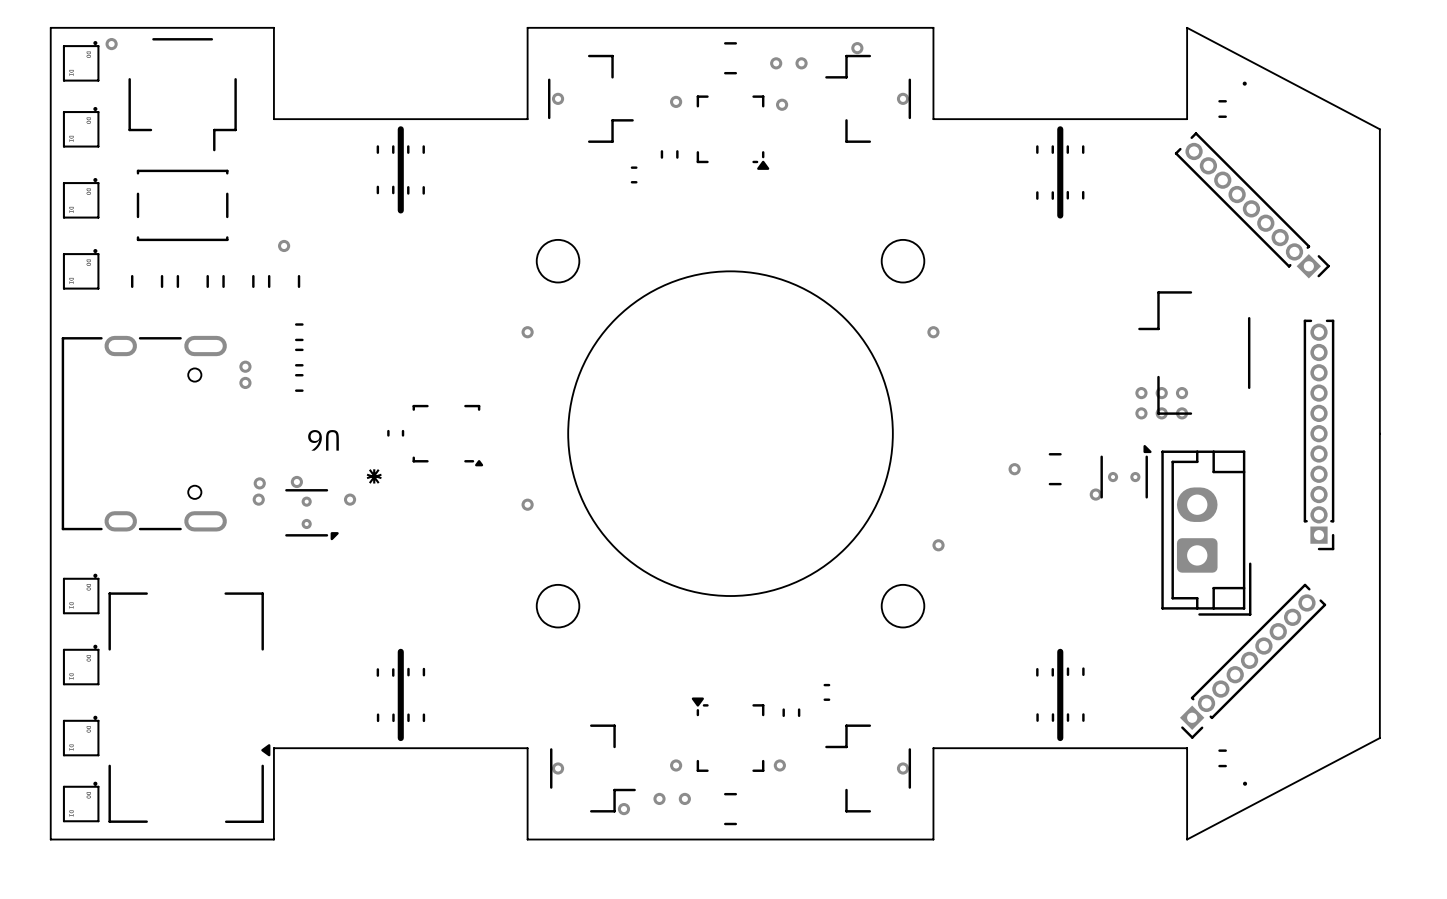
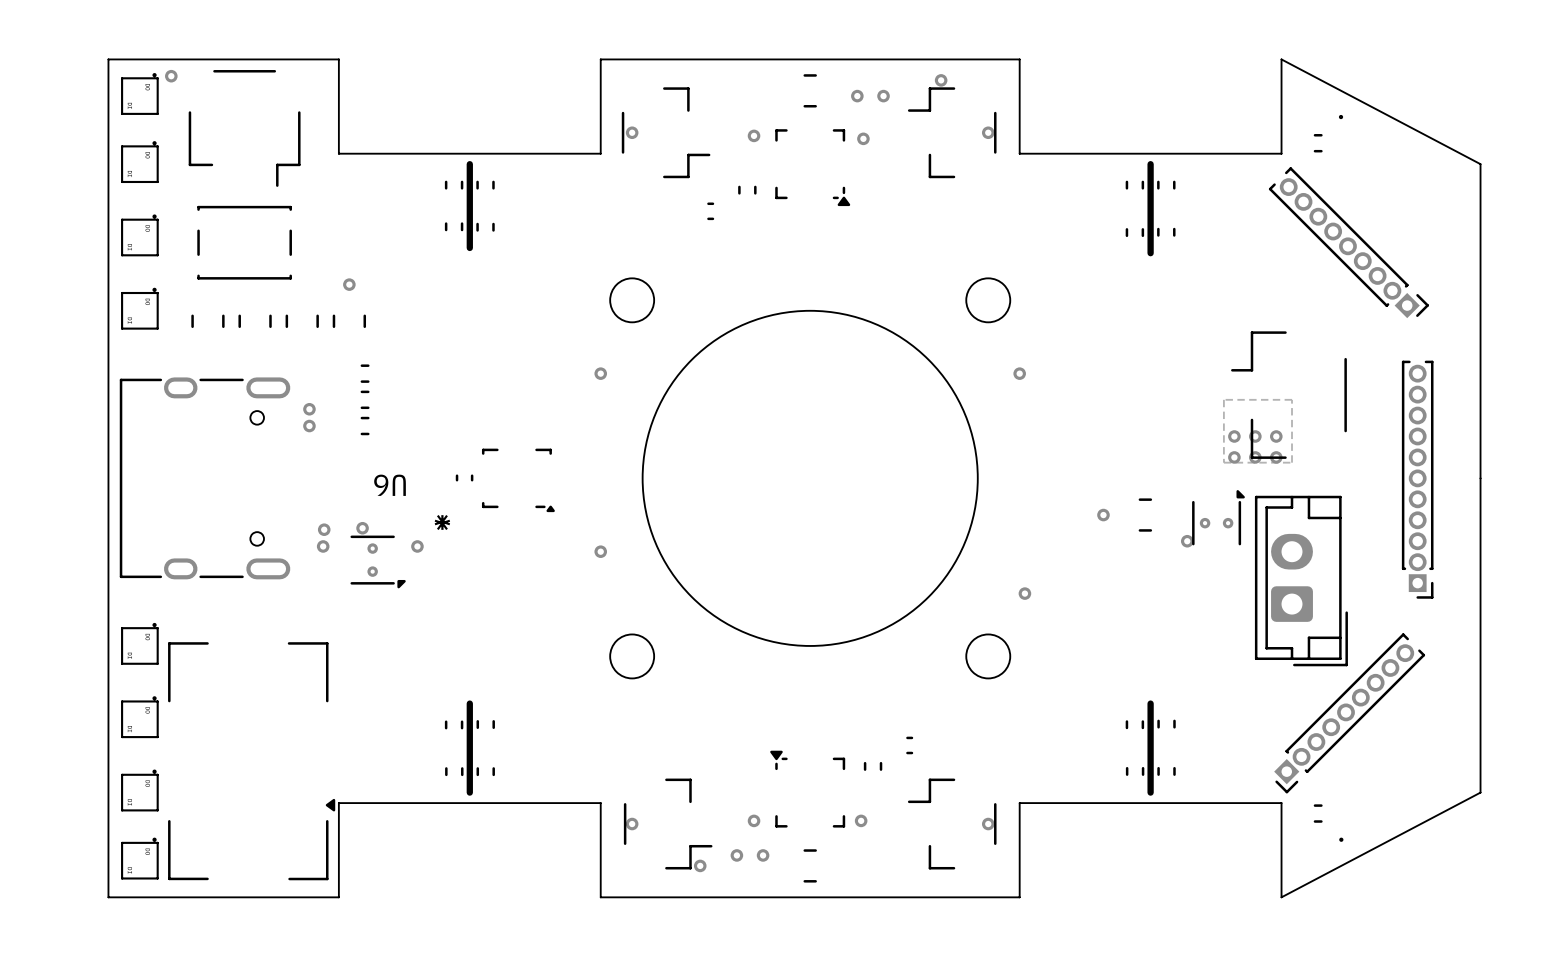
zone outline: none -> (1223, 399) (1292, 399) (1292, 462) (1223, 462) (1223, 399)

